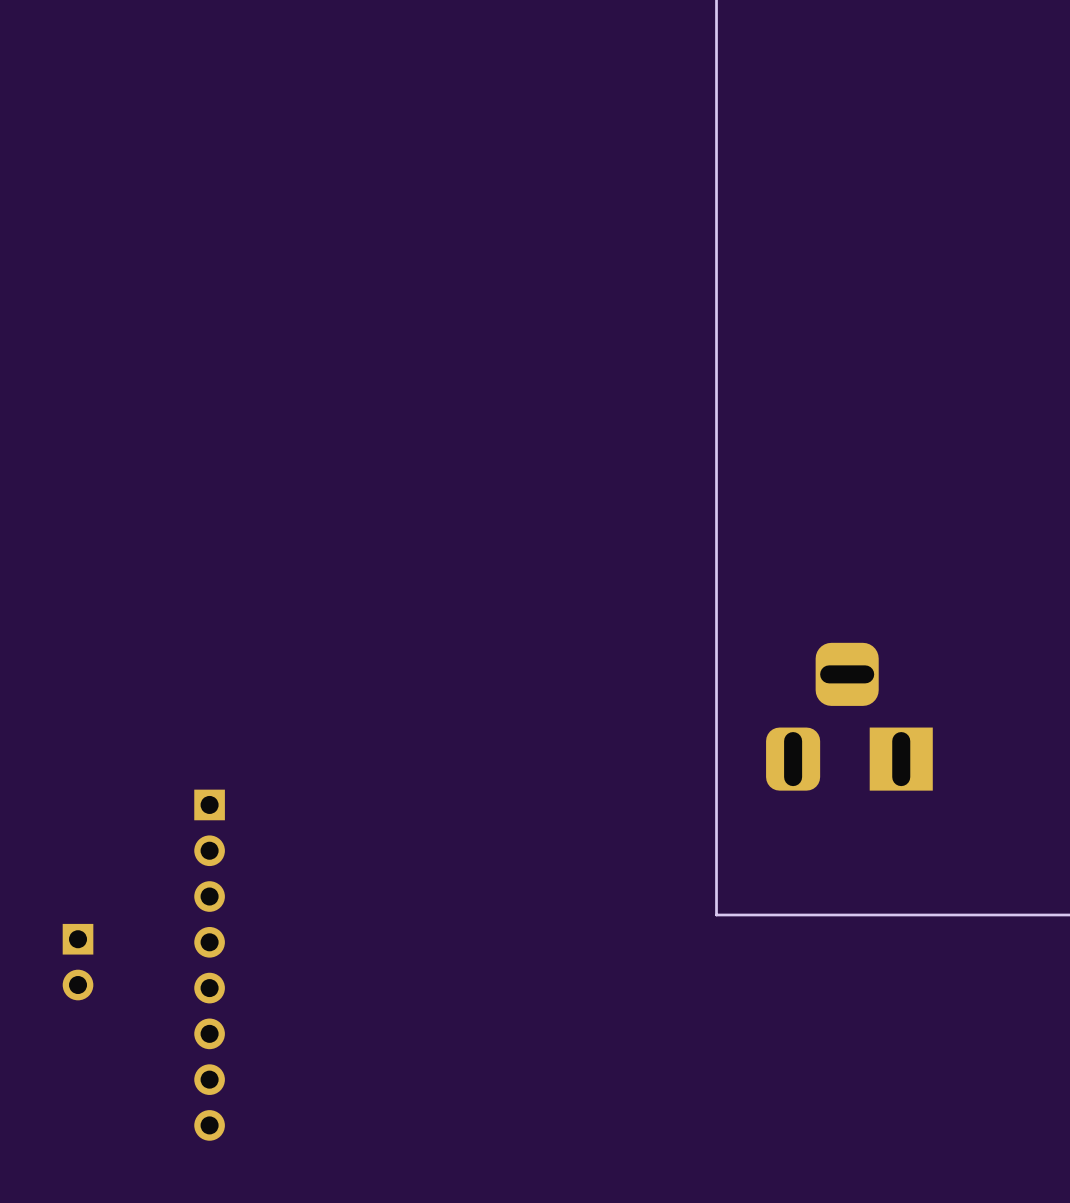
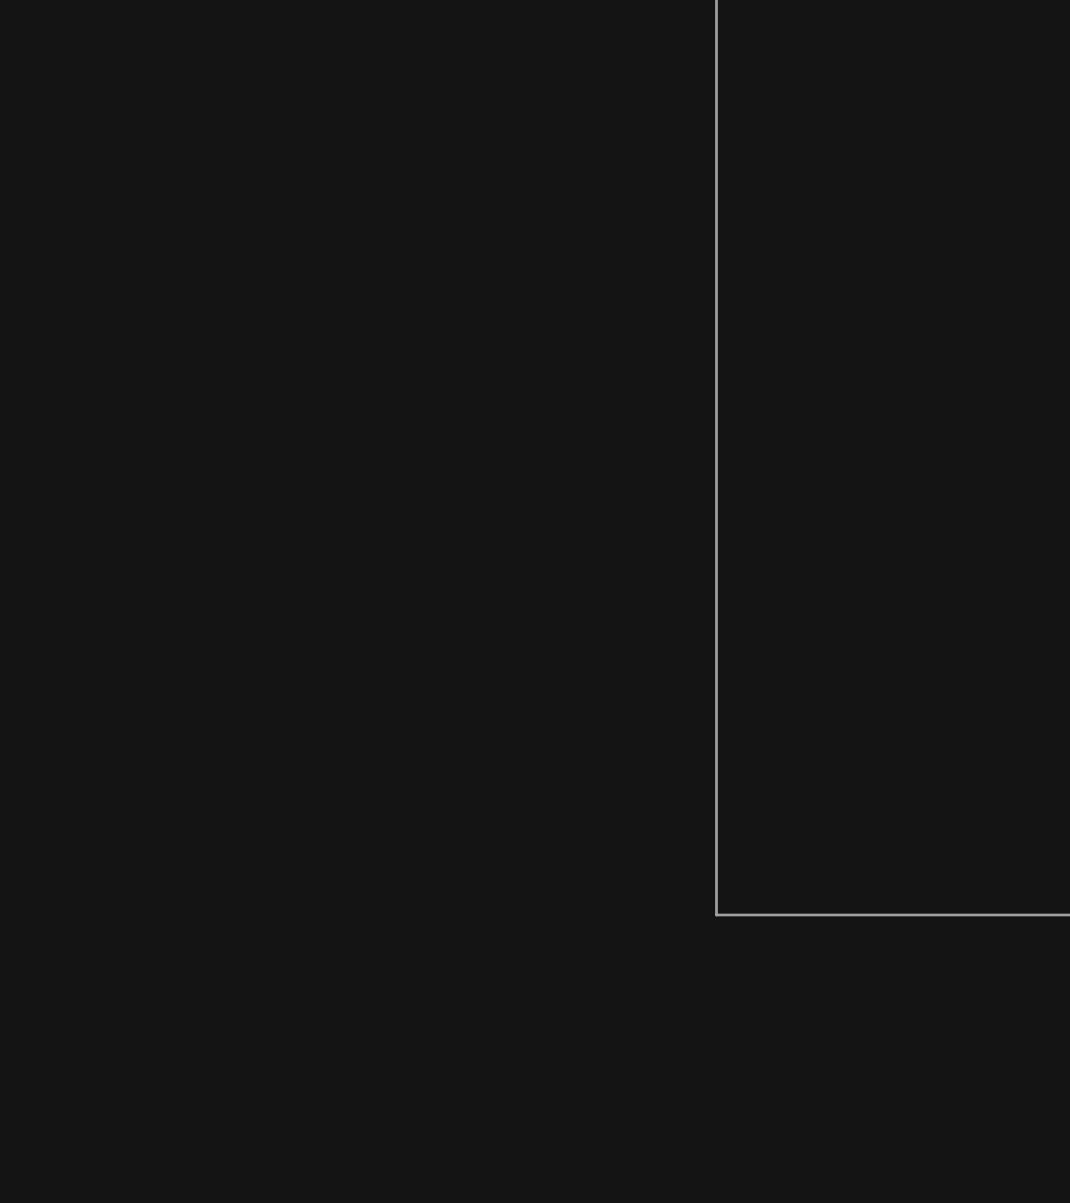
part: (849, 716) -> none
part: (78, 962) -> none
part: (209, 965) -> none

